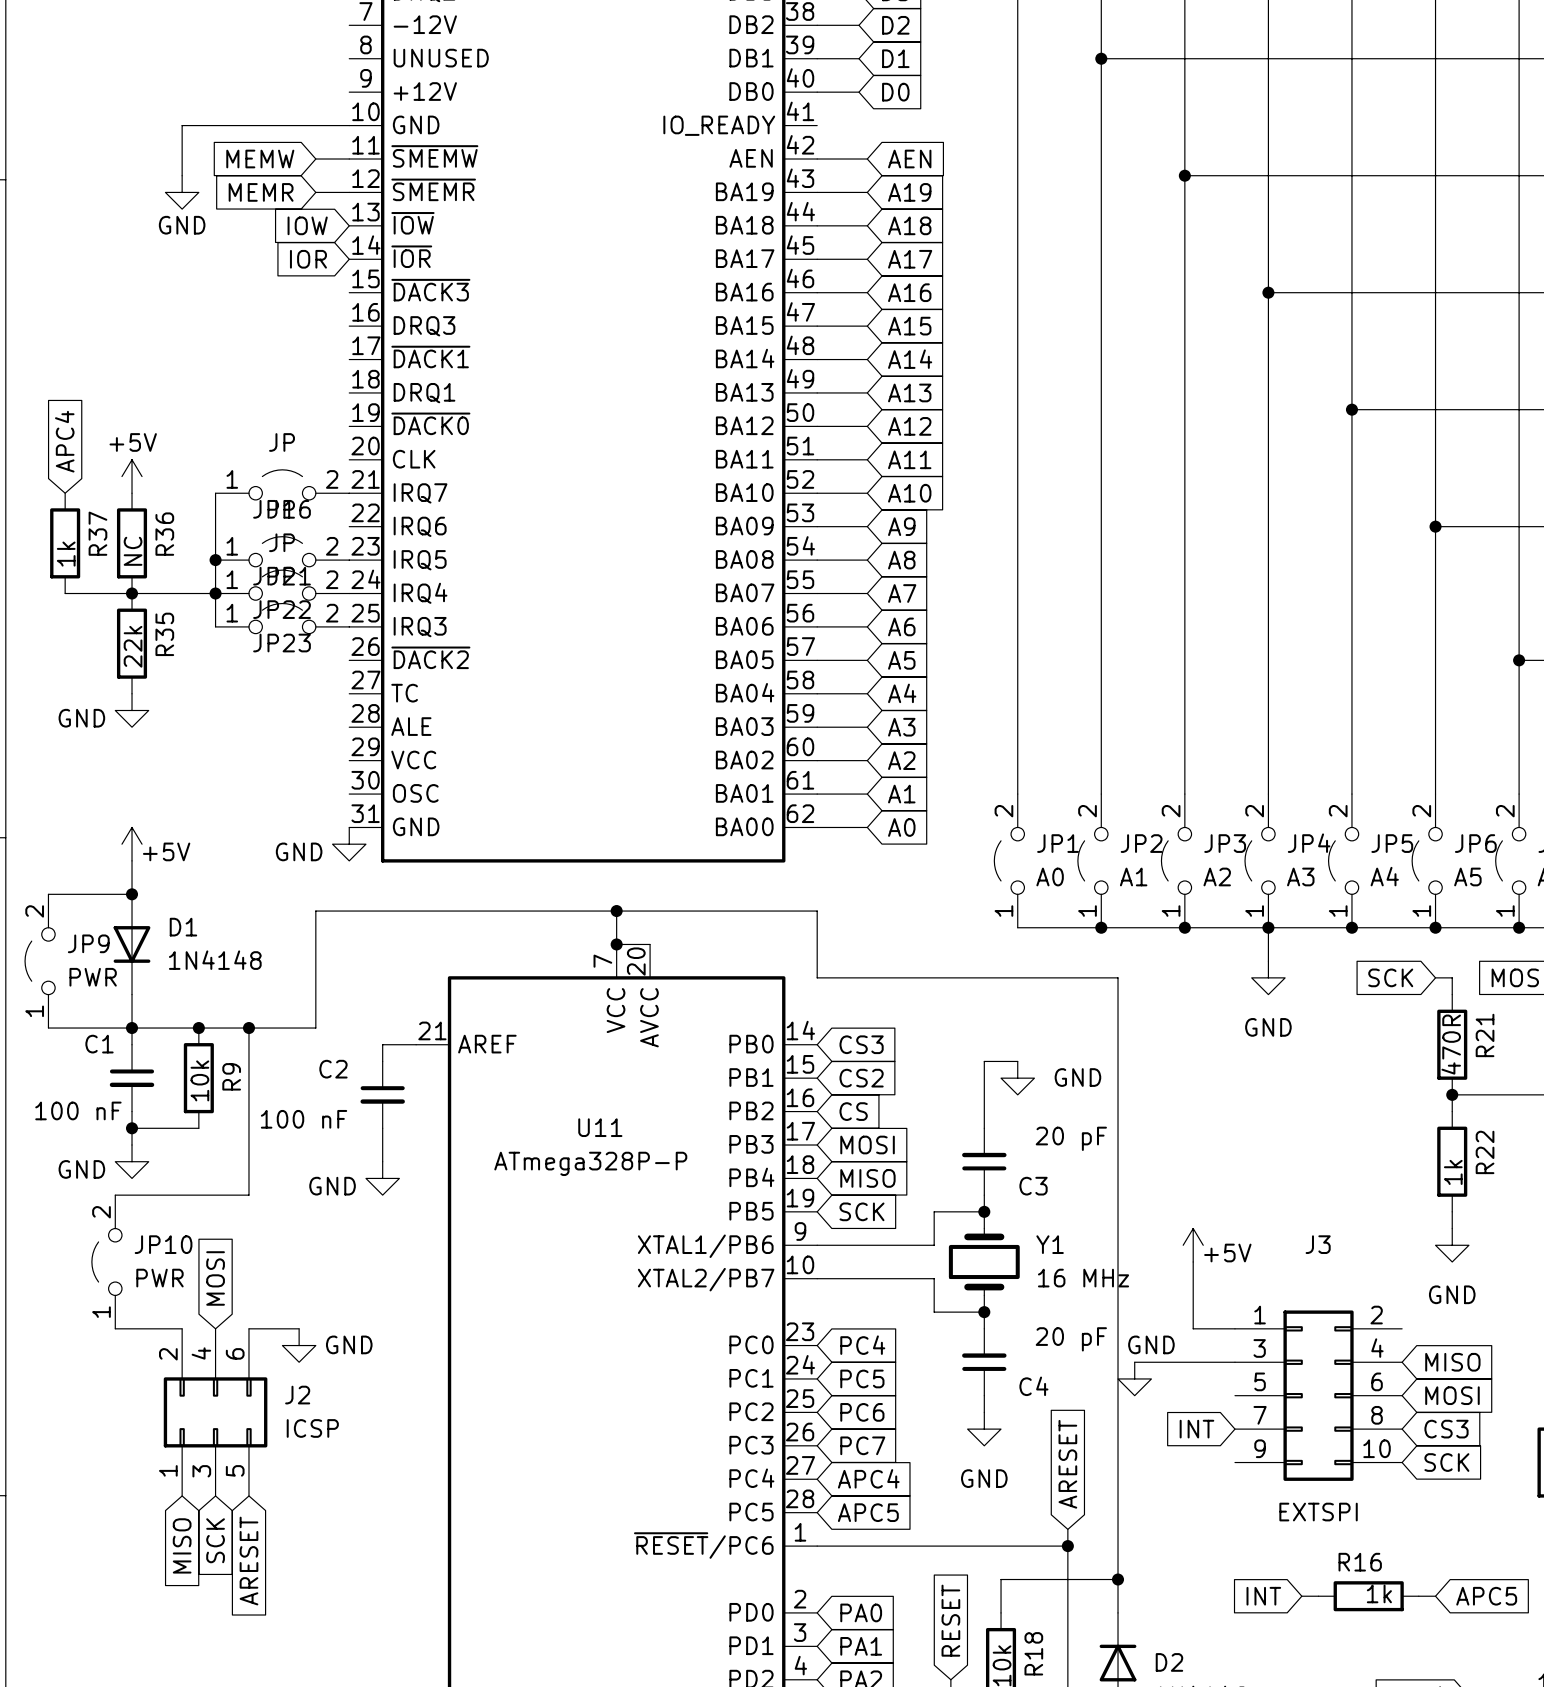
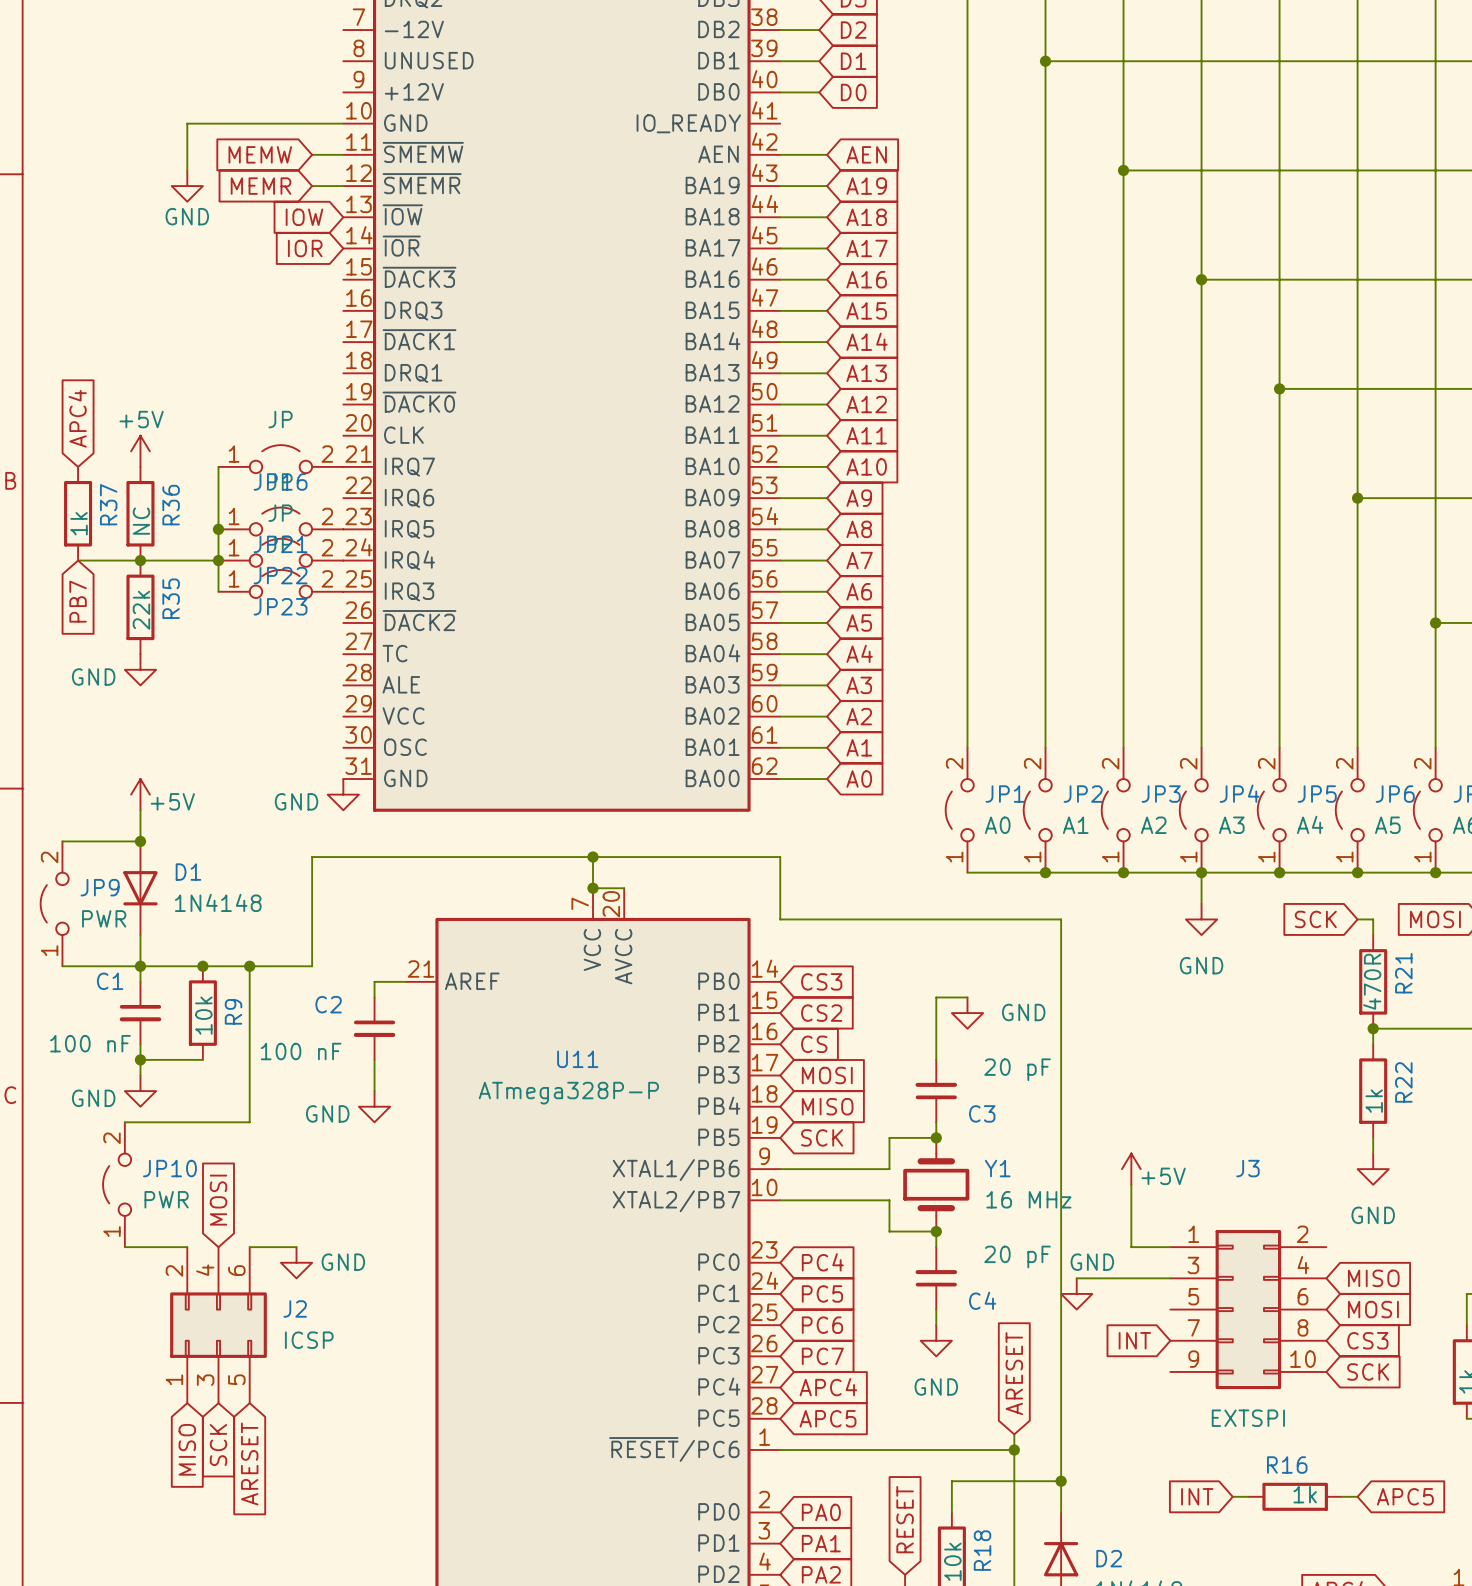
global label: none -> PB7 (78, 601)

